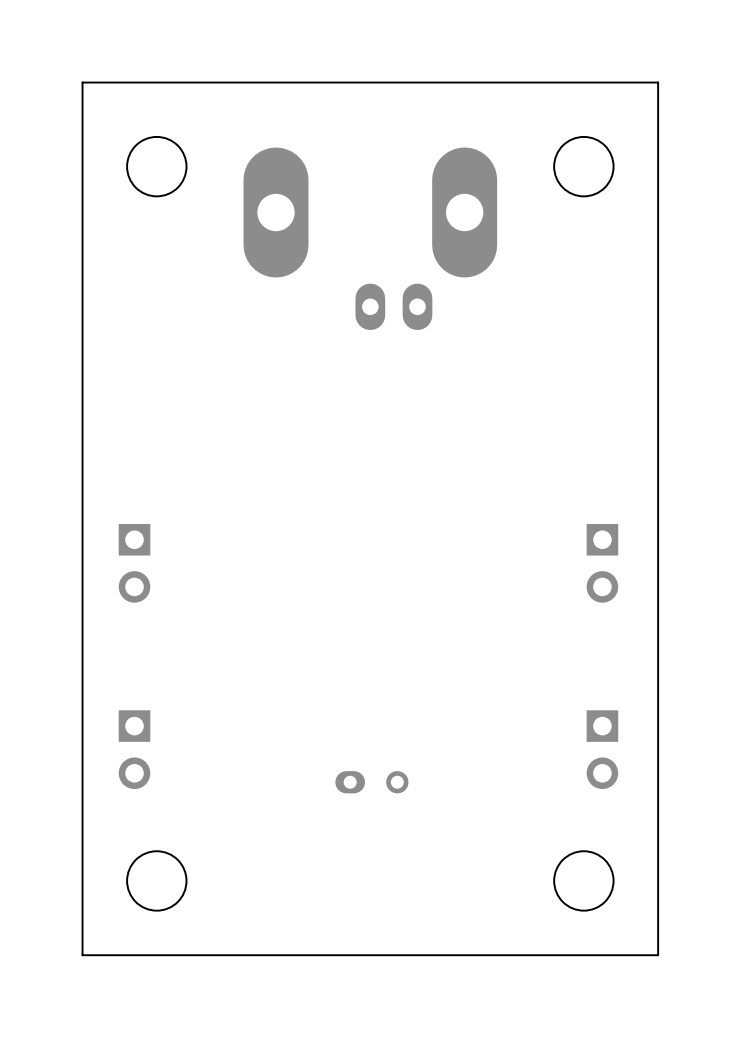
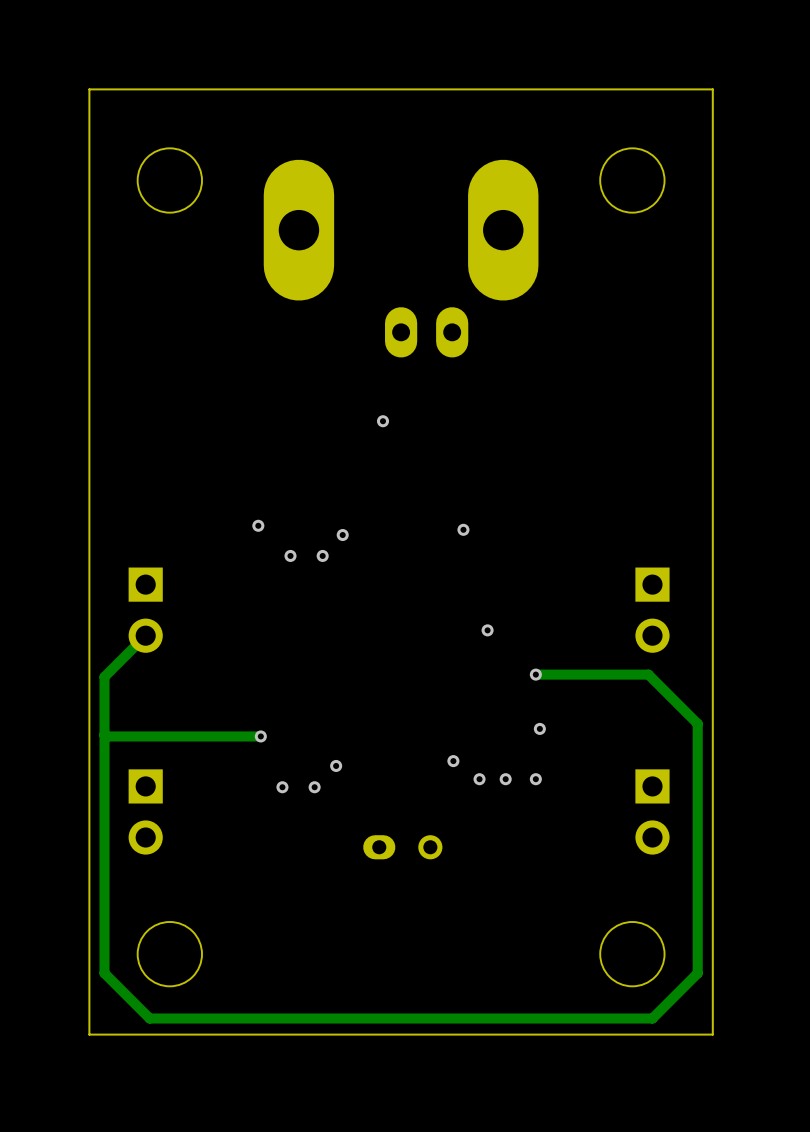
via: none -> (383, 421)
via: none -> (258, 525)
via: none -> (463, 529)
via: none -> (342, 535)
via: none -> (290, 555)
via: none -> (322, 555)
via: none -> (487, 630)
track: none -> (145, 635) (104, 676) (104, 973) (149, 1018) (652, 1018) (697, 973) (697, 723) (648, 674) (535, 674)
via: none -> (535, 674)
via: none -> (539, 728)
track: none -> (104, 734) (260, 736)
via: none -> (260, 736)
via: none -> (453, 761)
via: none -> (336, 765)
via: none -> (479, 779)
via: none -> (505, 779)
via: none -> (535, 779)
via: none -> (282, 787)
via: none -> (314, 787)

